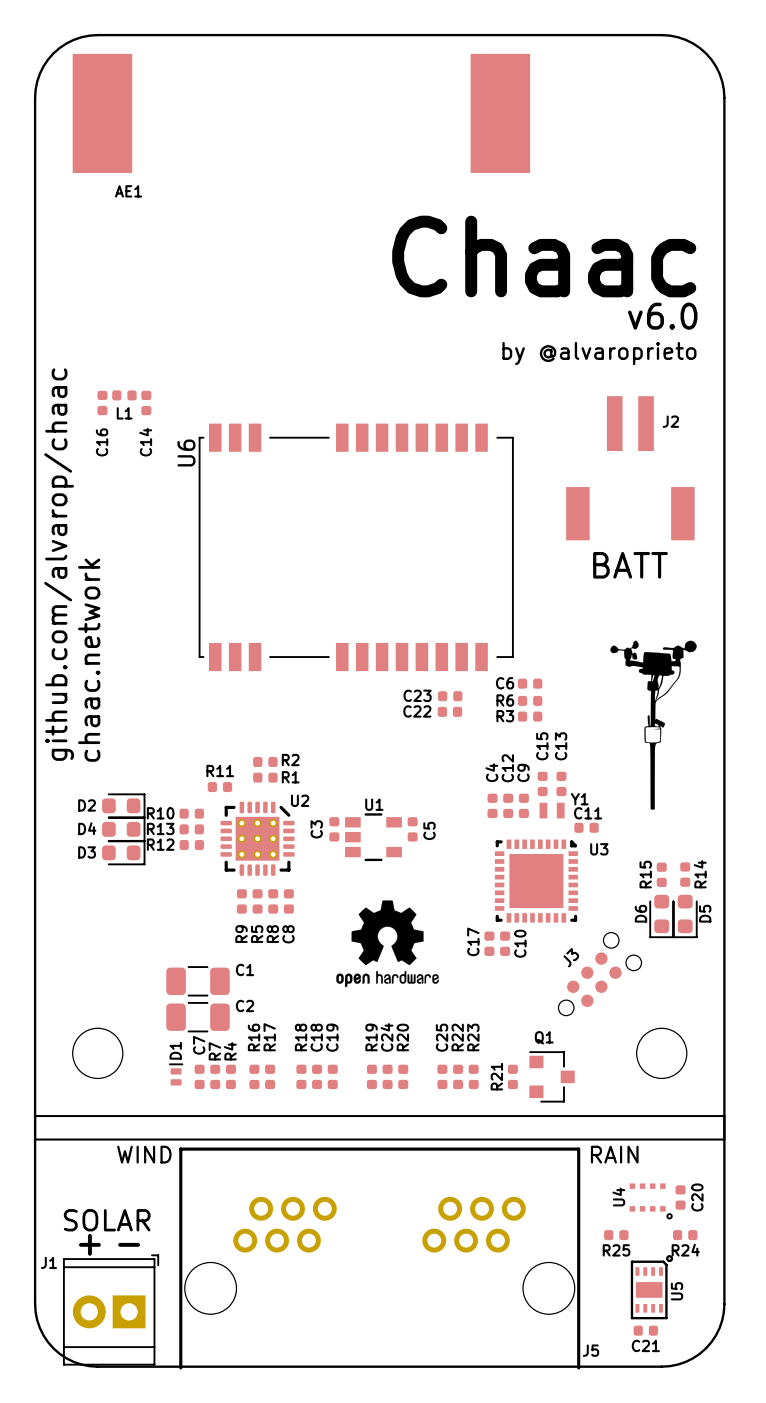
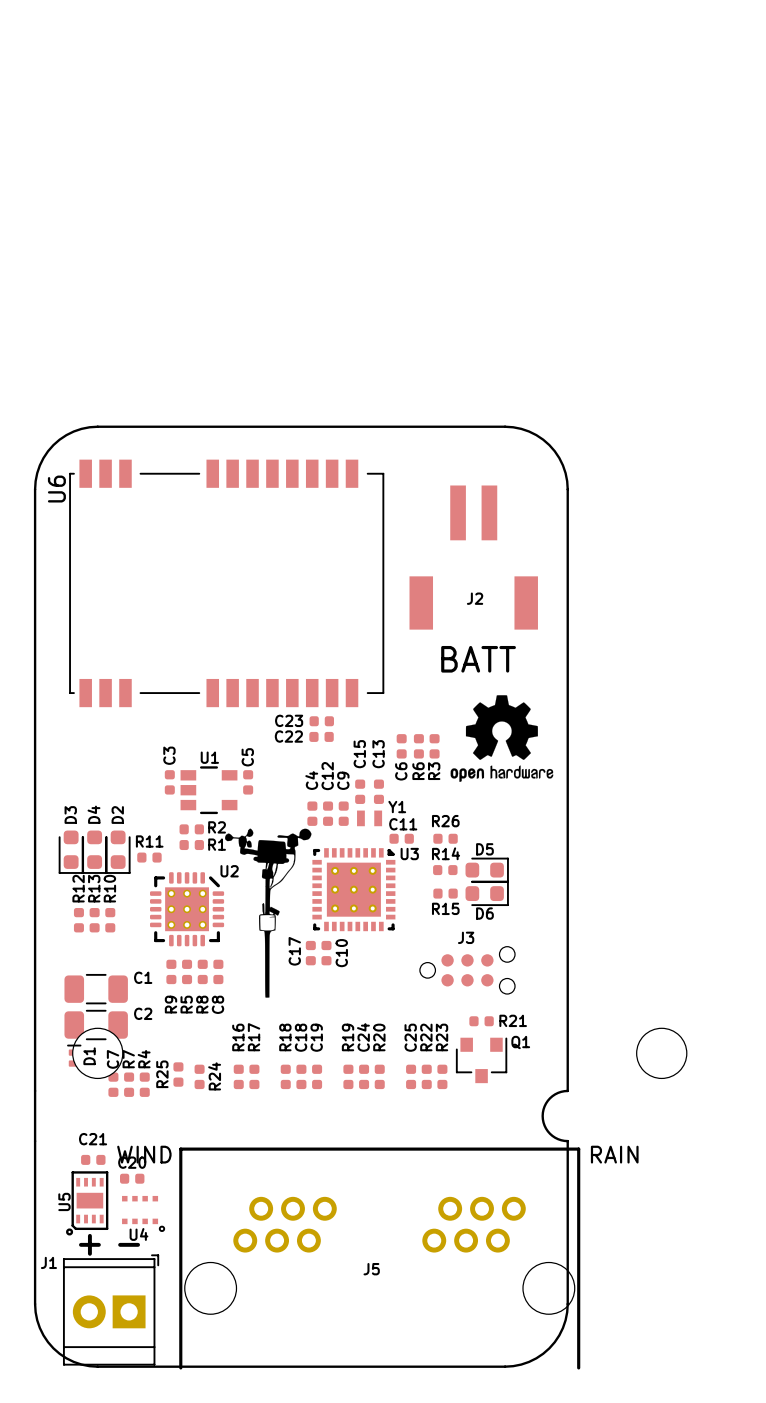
AE1: (301, 113) -> none
text: Chaac (544, 256) -> none
text: v6.0 (662, 316) -> none
text: by @alvaroprieto (599, 353) -> none
L1: (124, 395) -> none
C16: (102, 403) -> none
C14: (146, 403) -> none
J2 name position: J2 (670, 421) -> J2 (475, 598)
J2 position: (630, 468) -> (473, 557)
board edge: (35, 489) (35, 89) (39, 73) (48, 59) (66, 43) (81, 37) (97, 35) (661, 35) (677, 37) (693, 43) (706, 53) (716, 66) (722, 81) (724, 97) (723, 1312) (719, 1328) (711, 1342) (693, 1358) (677, 1364) (661, 1366) (505, 1366) -> (35, 489) (39, 465) (53, 445) (73, 431) (97, 426) (513, 427) (536, 435) (549, 445) (559, 458) (565, 473) (567, 489) (567, 1090) (558, 1092) (550, 1098) (544, 1106) (542, 1116) (544, 1125) (550, 1133) (558, 1139) (567, 1141) (567, 1304) (562, 1328) (549, 1348) (529, 1361) (505, 1366)
U6 position: (356, 547) -> (226, 583)
text: github.com/alvarop/chaac (59, 564) -> none
text position: BATT (630, 565) -> BATT (478, 659)
drawing: [610, 640, 697, 810] -> none
text: chaac.network (89, 660) -> none
C6 name position: C6 (505, 683) -> C6 (401, 771)
C6 rotation: 0° (530, 683) -> 90° clockwise (401, 746)
C6 position: (530, 683) -> (401, 746)
C23 position: (450, 696) -> (321, 721)
R6 name position: R6 (505, 700) -> R6 (418, 771)
R6 rotation: 0° (530, 700) -> 90° clockwise (418, 746)
R6 position: (530, 700) -> (418, 746)
C22 position: (450, 711) -> (321, 736)
R3 name position: R3 (505, 716) -> R3 (434, 771)
R3 rotation: 0° (530, 716) -> 90° clockwise (434, 746)
R3 position: (530, 716) -> (434, 746)
R2: (265, 761) -> none
R1: (265, 777) -> none
C15 position: (542, 783) -> (360, 791)
C13 position: (561, 783) -> (378, 791)
R11 position: (219, 787) -> (149, 857)
D2 rotation: 0° (123, 805) -> 90° clockwise (118, 852)
D2 position: (123, 805) -> (118, 852)
C4 position: (492, 805) -> (312, 813)
C12 position: (508, 805) -> (328, 813)
C9 position: (523, 805) -> (343, 813)
Y1 position: (552, 810) -> (369, 818)
R10 rotation: 0° (191, 813) -> 90° clockwise (110, 920)
R10 position: (191, 813) -> (110, 920)
C11 position: (586, 827) -> (401, 838)
R13 name: R13 (160, 828) -> R2 (217, 827)
drawing: none -> [225, 828, 312, 998]
D4 rotation: 0° (123, 829) -> 90° clockwise (94, 852)
D4 position: (123, 829) -> (94, 852)
C3 name position: C3 (316, 829) -> C3 (169, 755)
C3 position: (334, 829) -> (169, 782)
C5 position: (412, 829) -> (248, 782)
C5 name position: C5 (429, 830) -> C5 (247, 757)
U1 position: (373, 837) -> (208, 790)
U2 position: (257, 838) -> (187, 909)
R26: none -> (445, 838)
U3 footprint: [494, 839, 578, 923] -> [312, 848, 396, 932]
R12 name: R12 (160, 844) -> R1 (217, 844)
D3 rotation: 0° (123, 852) -> 90° clockwise (71, 852)
D3 position: (123, 852) -> (71, 852)
R15 rotation: 0° (661, 874) -> 90° clockwise (445, 893)
R15 position: (661, 874) -> (445, 893)
R14 rotation: 0° (685, 874) -> 90° clockwise (445, 870)
R14 position: (685, 874) -> (445, 870)
R9 position: (241, 901) -> (171, 971)
R5 position: (257, 901) -> (187, 971)
R8 position: (273, 901) -> (202, 971)
C8 position: (288, 901) -> (218, 971)
D6 rotation: 0° (661, 916) -> 90° counterclockwise (487, 893)
D6 position: (661, 916) -> (487, 893)
D5 rotation: 0° (685, 916) -> 90° counterclockwise (487, 870)
D5 position: (685, 916) -> (487, 870)
R12: none -> (78, 920)
R13: none -> (94, 920)
drawing position: (387, 943) -> (501, 738)
C17 position: (489, 943) -> (310, 953)
C10 position: (505, 943) -> (326, 953)
J3 rotation: 0° (599, 974) -> 45° clockwise (467, 970)
J3 position: (599, 974) -> (467, 970)
C1 position: (198, 981) -> (96, 989)
C2 position: (198, 1017) -> (96, 1025)
R16 name: R16 (254, 1037) -> R17 (254, 1037)
R18 name: R18 (301, 1037) -> C18 (301, 1037)
C18 name: C18 (316, 1037) -> C19 (316, 1037)
C25 name: C25 (442, 1037) -> R23 (442, 1037)
C7 name: C7 (199, 1045) -> R24 (214, 1076)
D1 name position: D1 (175, 1050) -> D1 (89, 1056)
D1 position: (176, 1074) -> (74, 1055)
R7 position: (215, 1076) -> (129, 1084)
R4 position: (230, 1076) -> (144, 1084)
R16: none -> (238, 1076)
R17: (270, 1076) -> none
R18: none -> (285, 1076)
C19: (332, 1076) -> none
R19 position: (371, 1076) -> (348, 1076)
C24 position: (387, 1076) -> (364, 1076)
R20 position: (403, 1076) -> (379, 1076)
C25: none -> (411, 1076)
R22 position: (458, 1076) -> (426, 1076)
R23: (473, 1076) -> none
R21 name position: R21 (496, 1076) -> R21 (513, 1020)
R21 rotation: 0° (512, 1076) -> 90° clockwise (481, 1021)
R21 position: (512, 1076) -> (481, 1021)
Q1 rotation: 0° (551, 1076) -> 90° clockwise (481, 1060)
Q1 position: (551, 1076) -> (481, 1060)
C7: none -> (113, 1084)
line: (35, 1116) (724, 1116) (724, 1139) (35, 1139) (35, 1116) -> none
U4 name rotation: 0° (618, 1197) -> 90° clockwise (138, 1234)
U4 name position: U4 (618, 1197) -> U4 (138, 1234)
C20 rotation: 0° (680, 1197) -> 90° clockwise (132, 1178)
C20 position: (680, 1197) -> (132, 1178)
U4 position: (651, 1201) -> (143, 1213)
text: SOLAR (107, 1220) -> none
R25 rotation: 0° (616, 1235) -> 90° clockwise (178, 1074)
R25 position: (616, 1235) -> (178, 1074)
R24: (685, 1235) -> none
U5 rotation: 0° (651, 1287) -> 180° (87, 1203)
U5 position: (651, 1287) -> (87, 1203)
C21 position: (645, 1330) -> (93, 1159)
C21 name position: C21 (645, 1345) -> C21 (93, 1139)
J5 name position: J5 (590, 1350) -> J5 (371, 1269)

